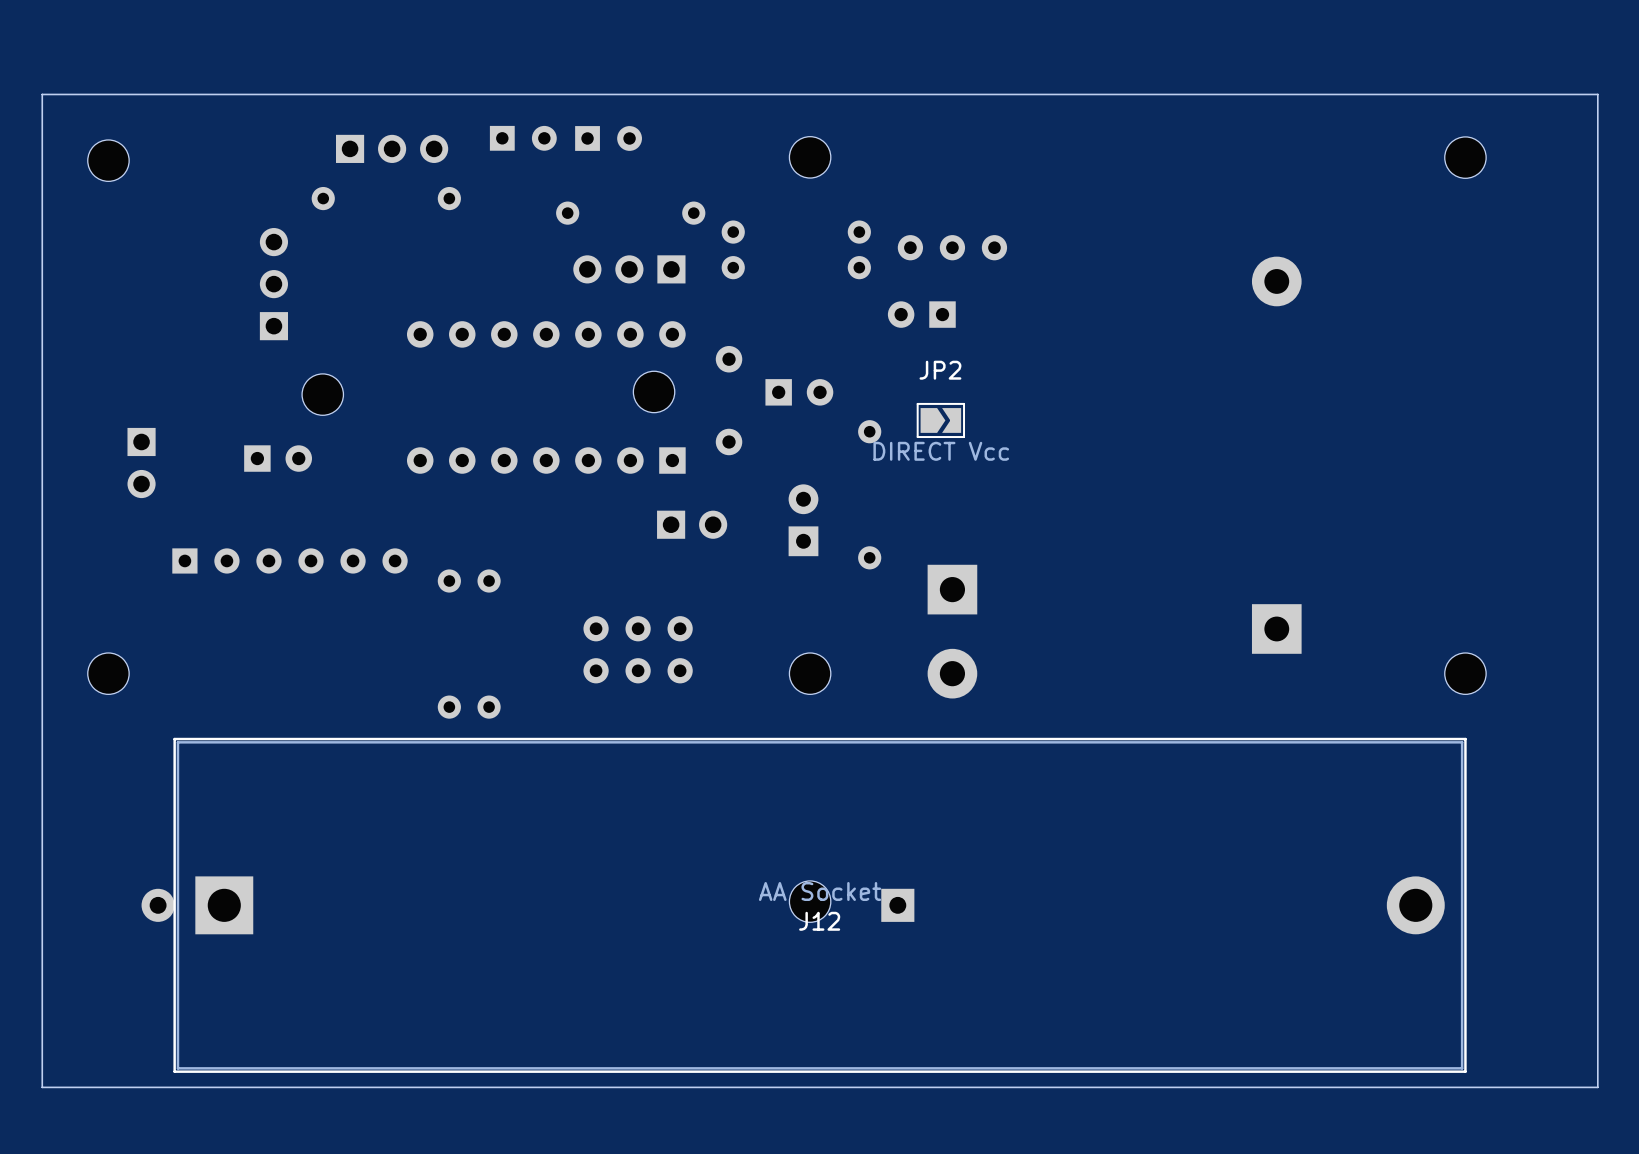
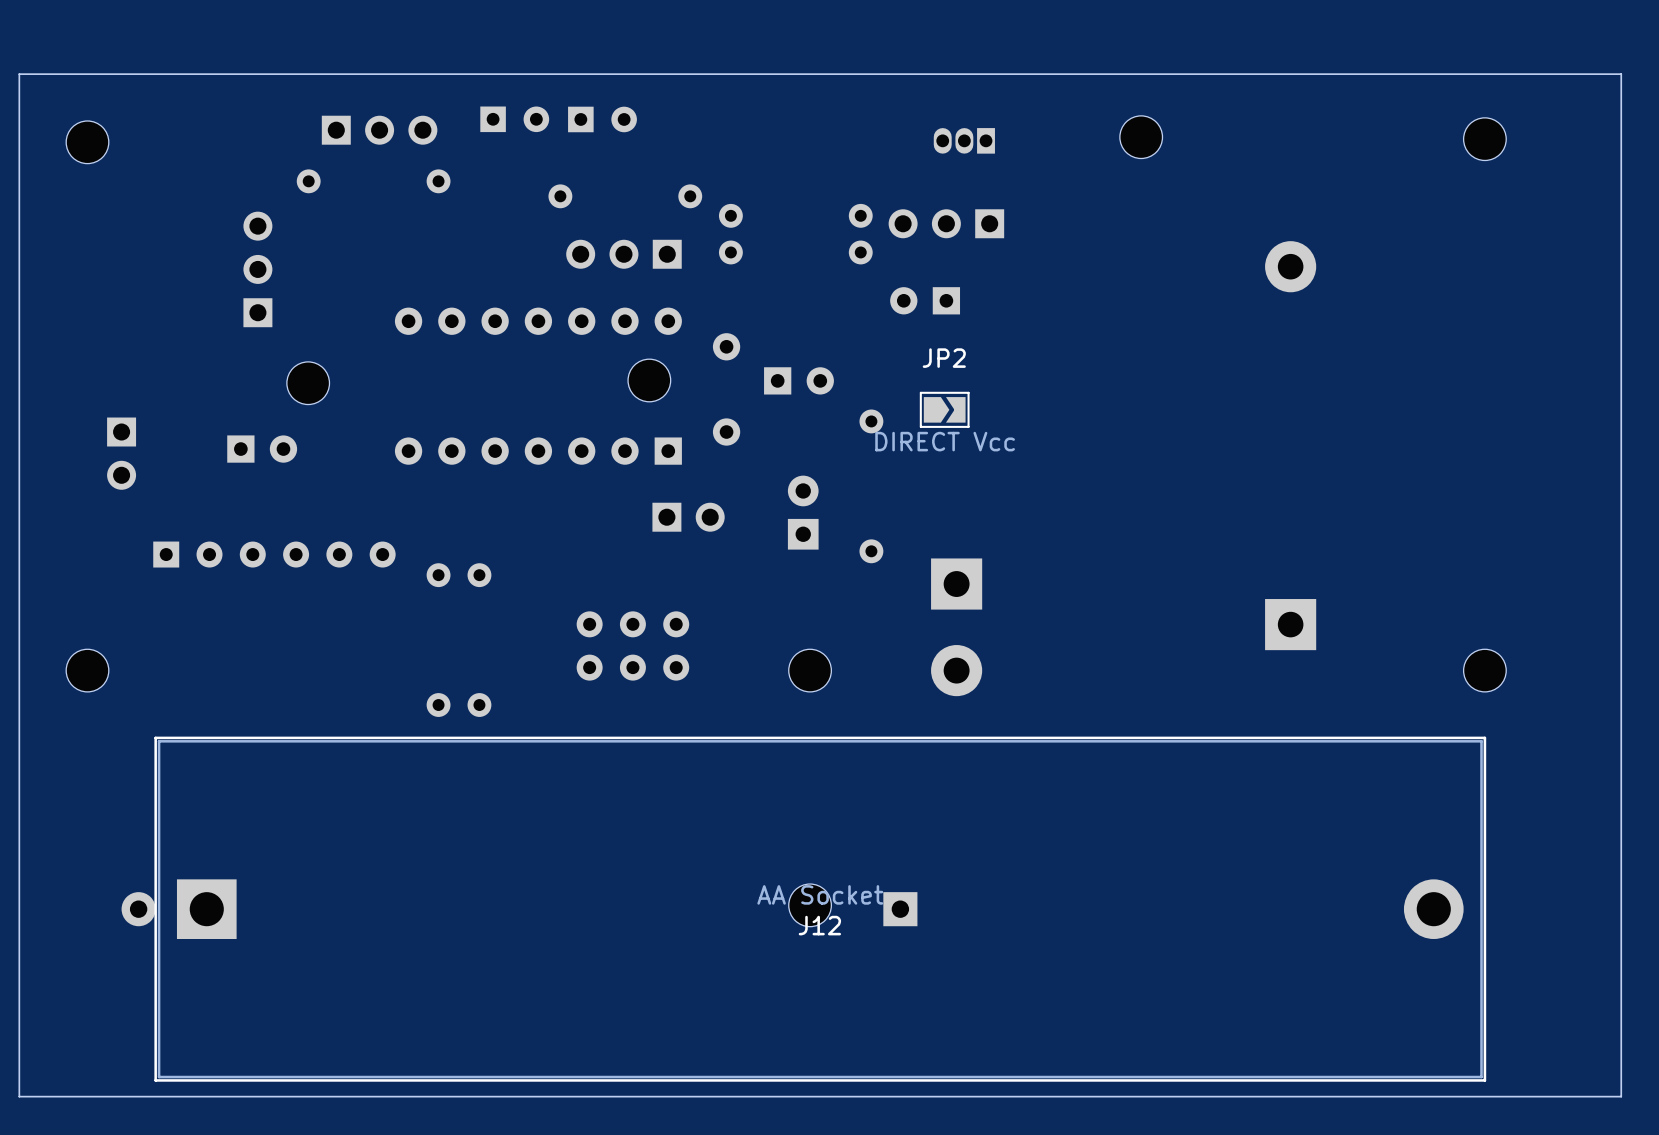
part position: (810, 157) -> (1141, 137)
part: none -> (964, 140)
part footprint: [897, 235, 1008, 261] -> [888, 209, 1005, 239]

